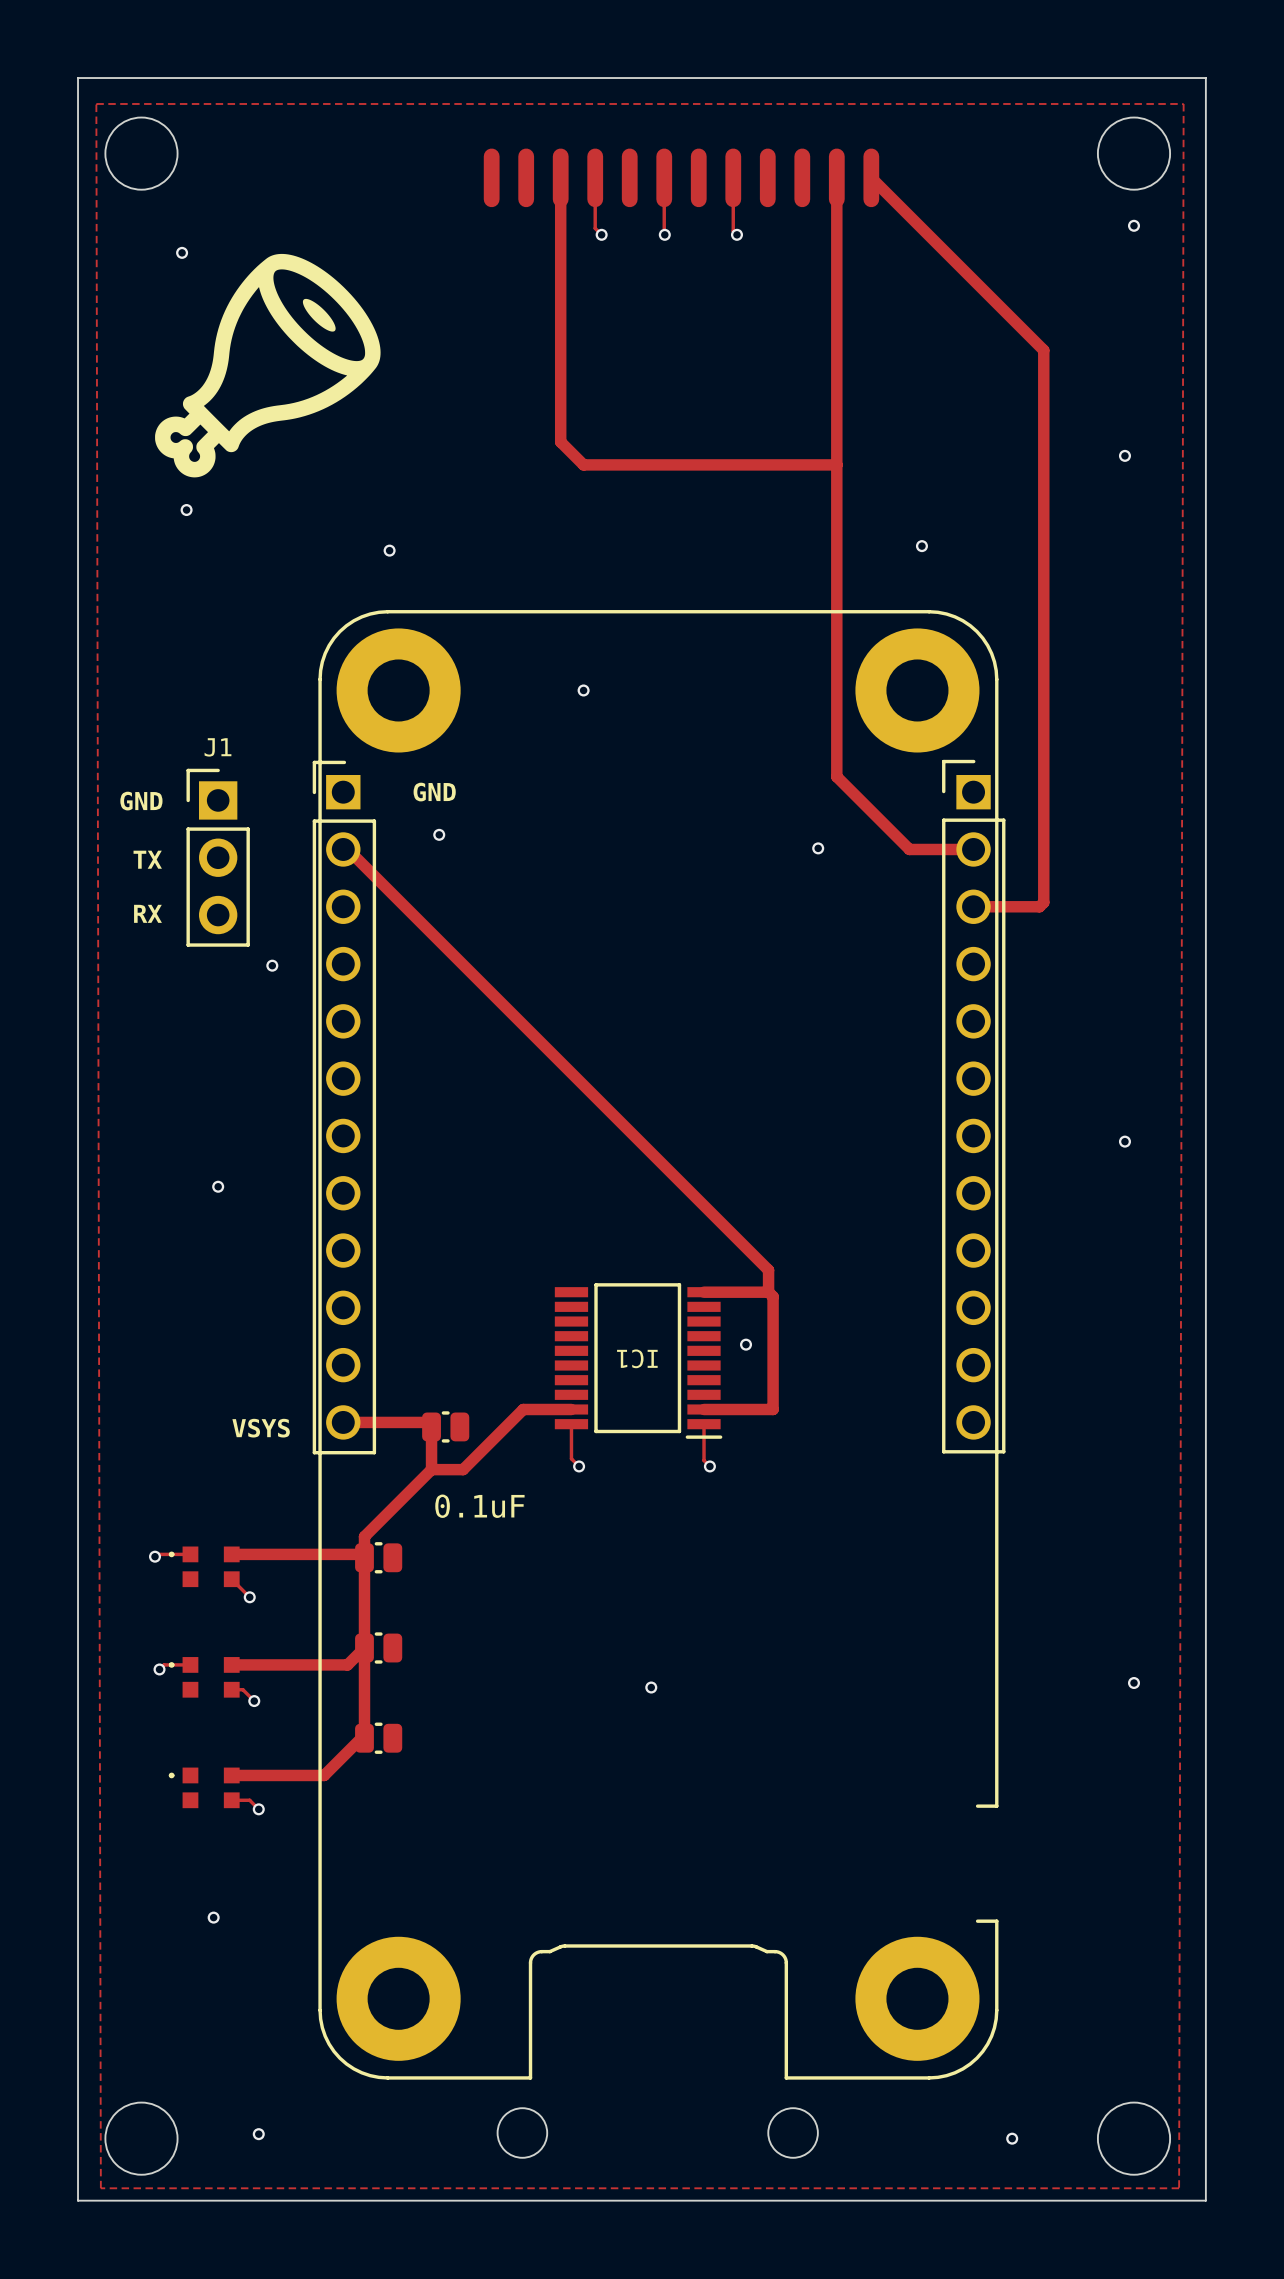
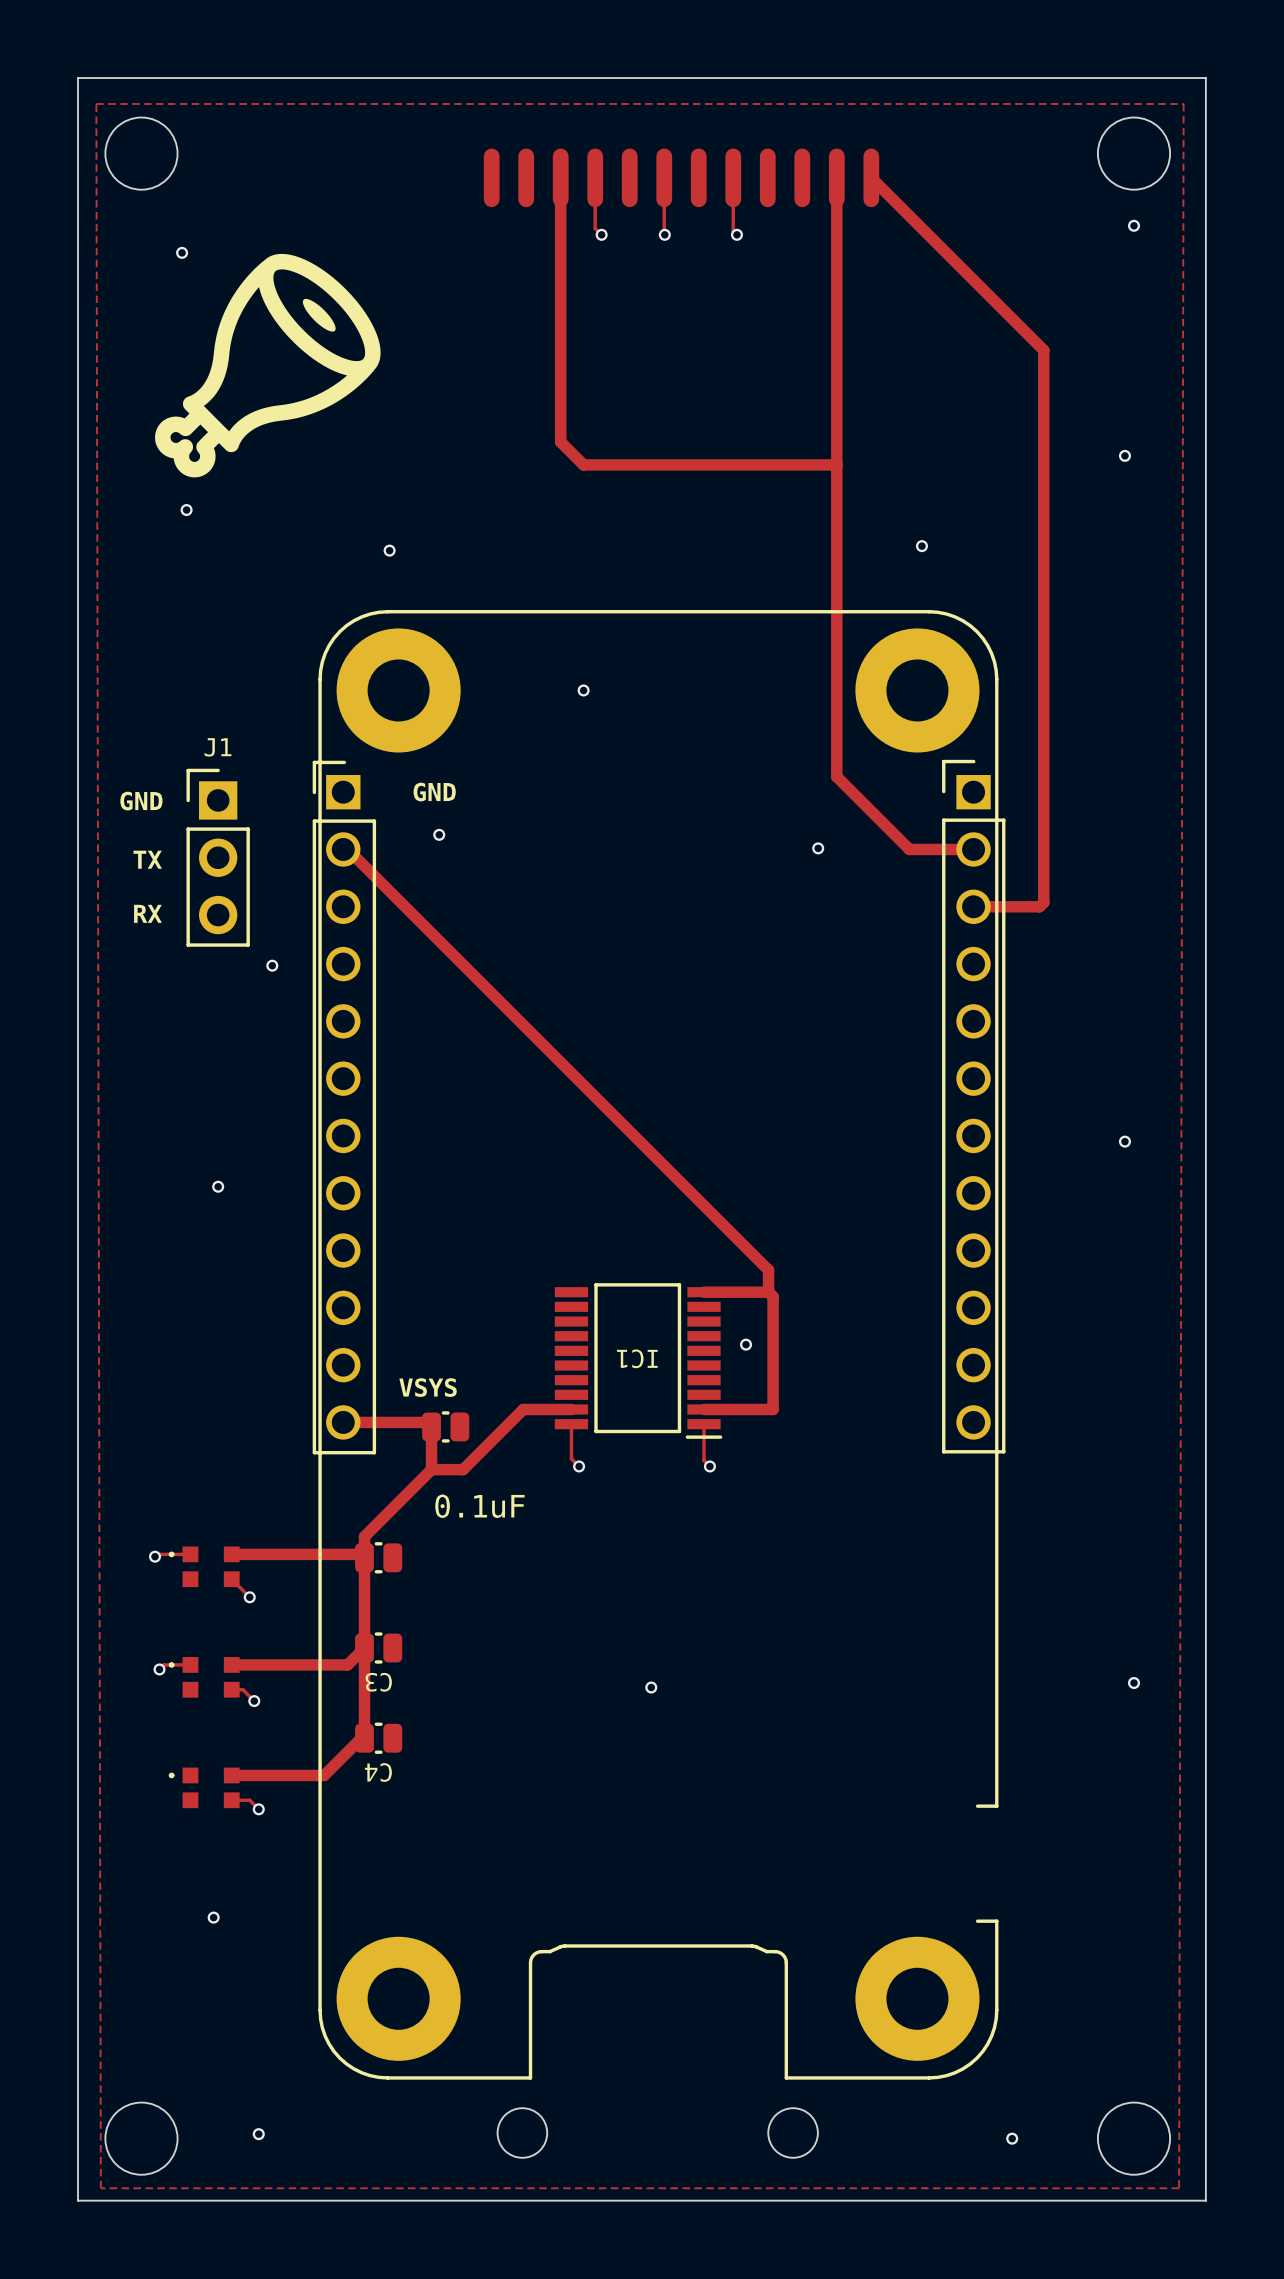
text position: VSYS (261, 1428) -> VSYS (428, 1387)
C3 name: none -> C3 (378, 1682)
C4 name: none -> C4 (378, 1772)

